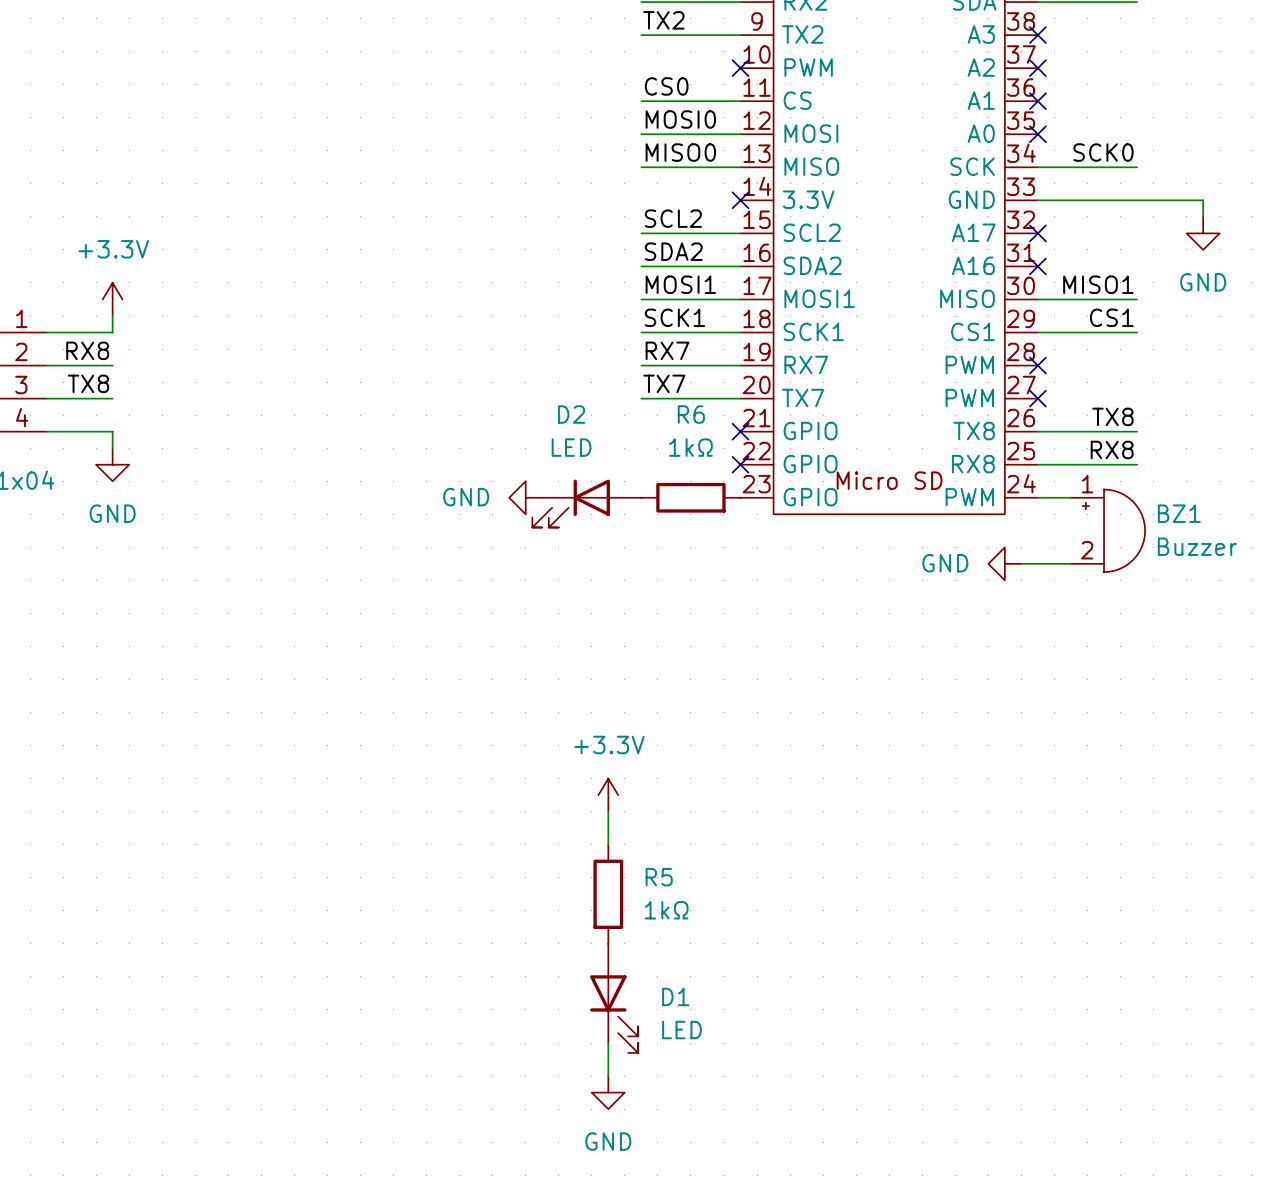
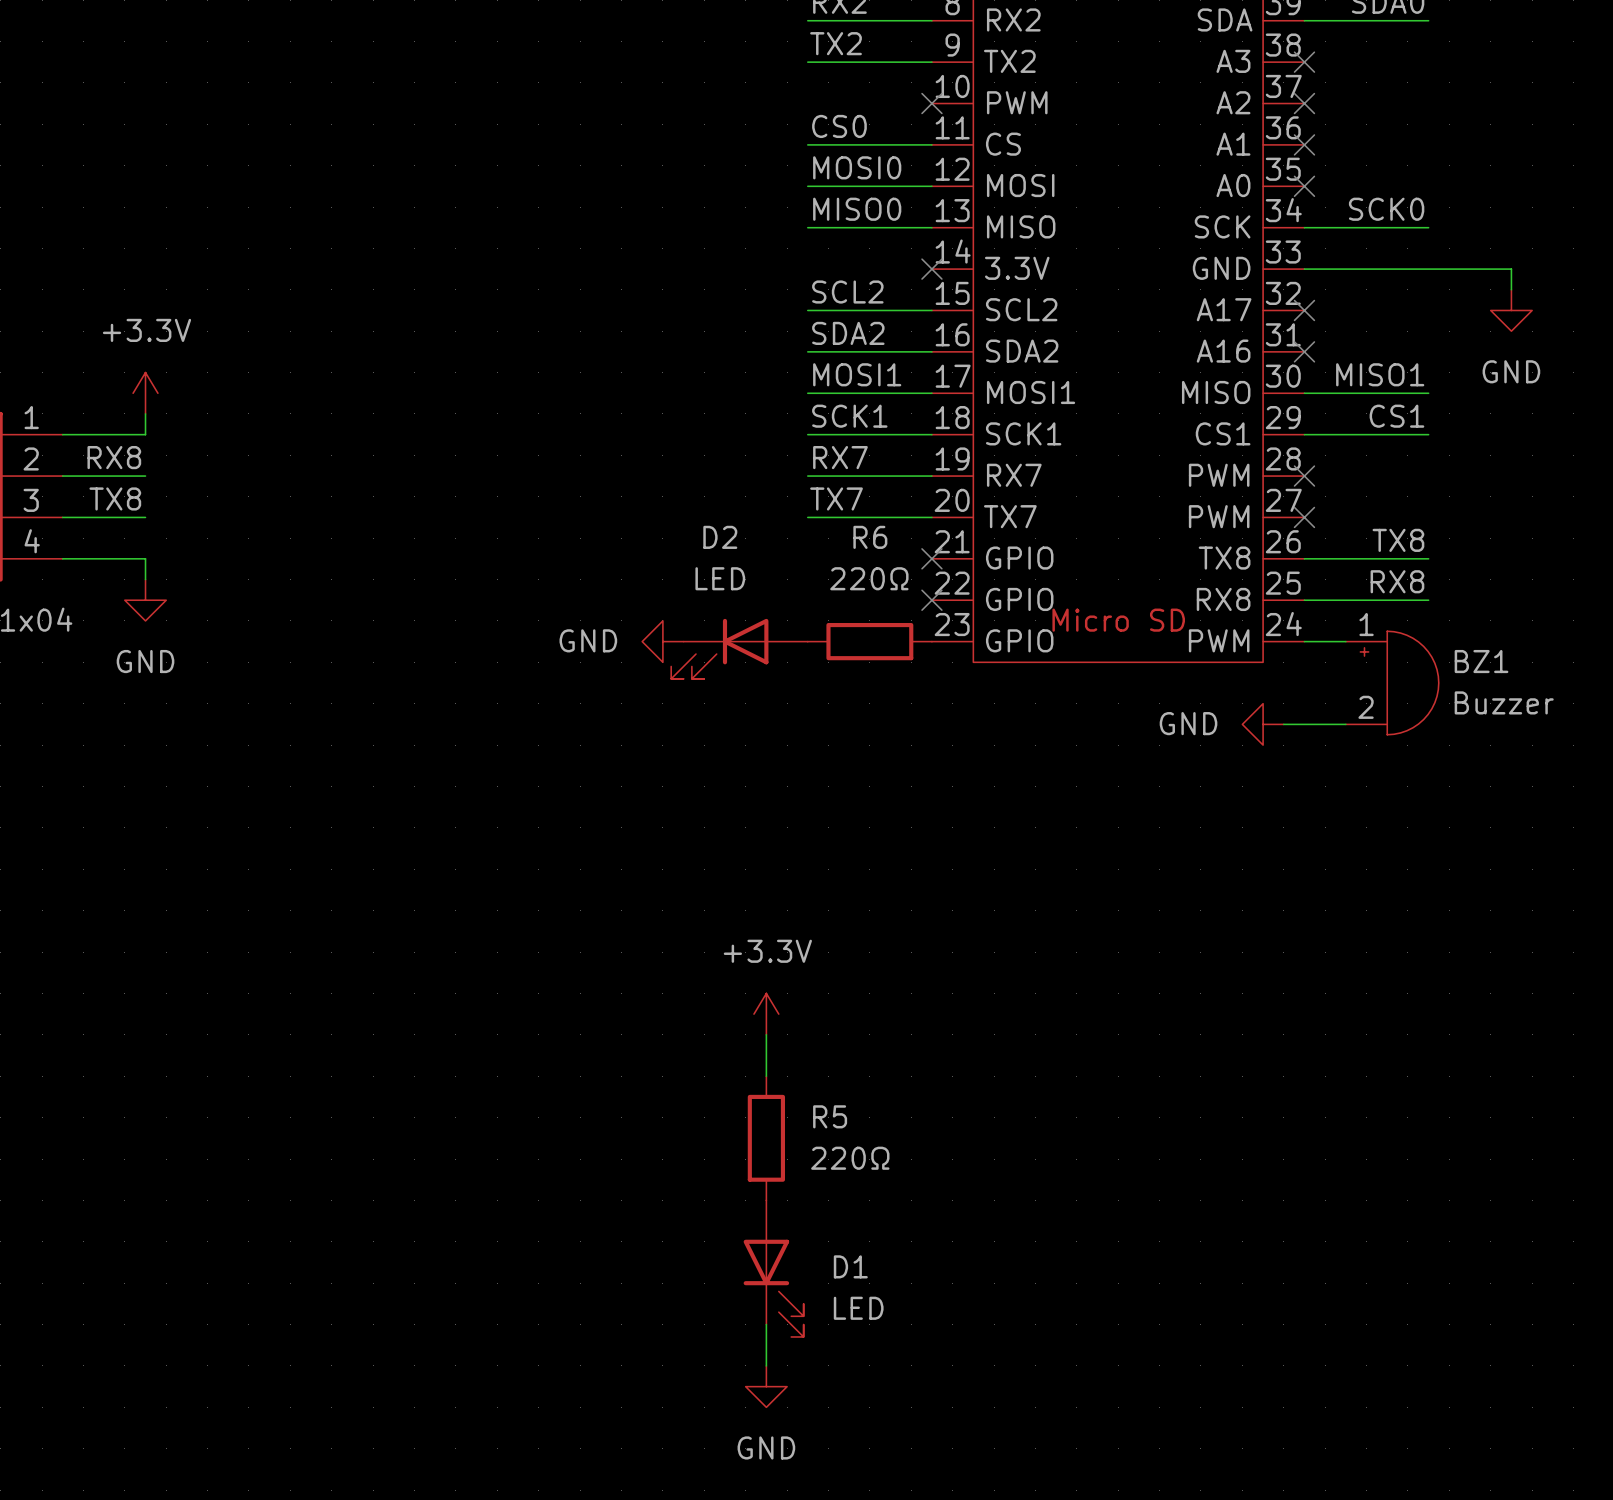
R6 value: 1kΩ (690, 447) -> 220Ω (869, 578)
R5 value: 1kΩ (666, 910) -> 220Ω (850, 1158)

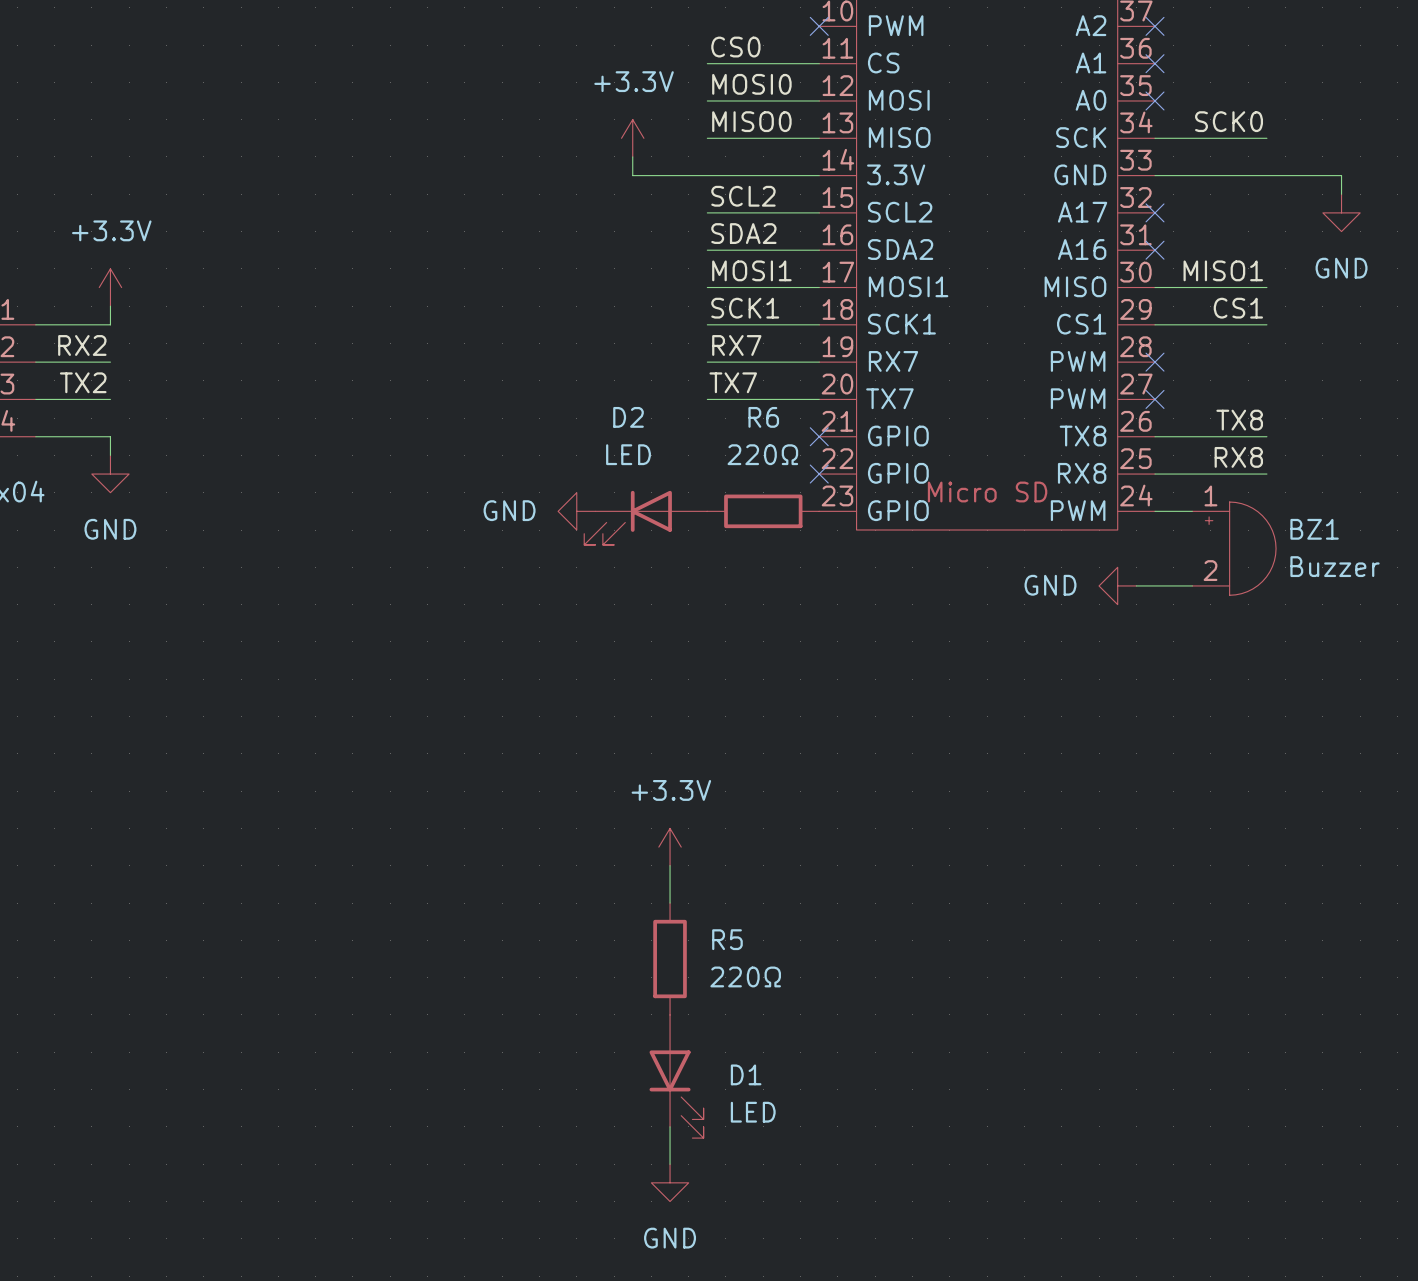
power symbol: none -> +3.3V (632, 138)
wire: none -> (632, 156) (632, 175) (819, 175)
no-connect mark: (931, 269) -> none
label: RX8 (114, 457) -> RX2 (82, 345)
label: TX8 (115, 498) -> TX2 (83, 382)

